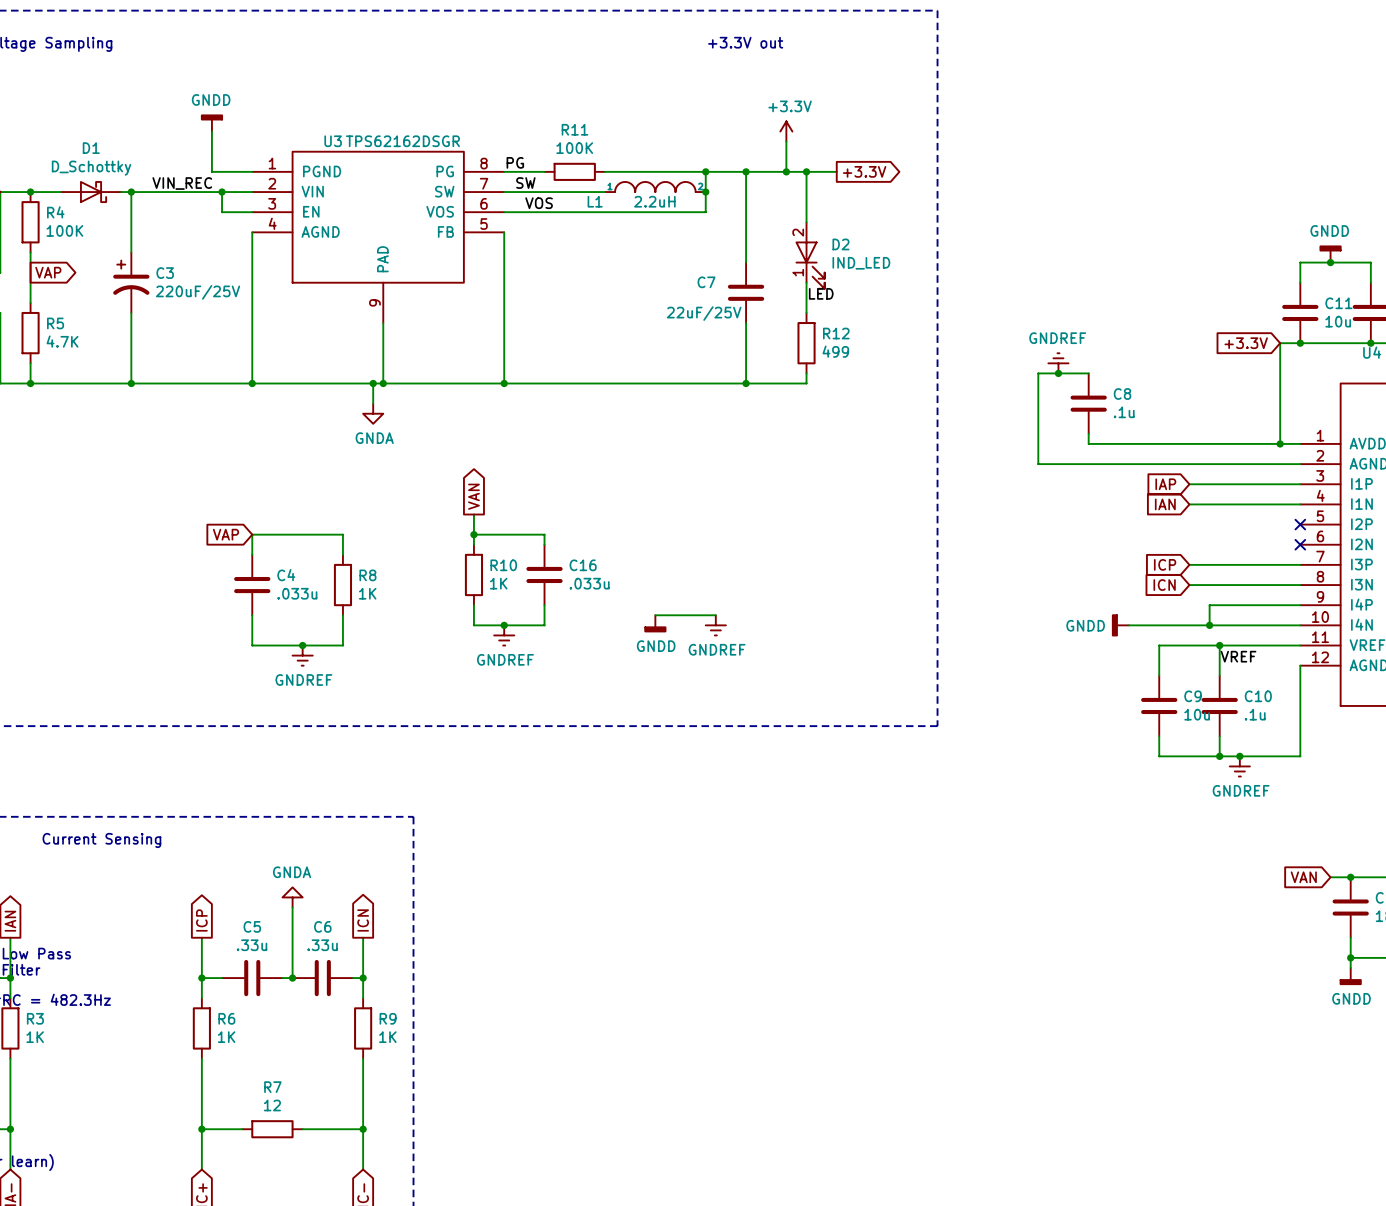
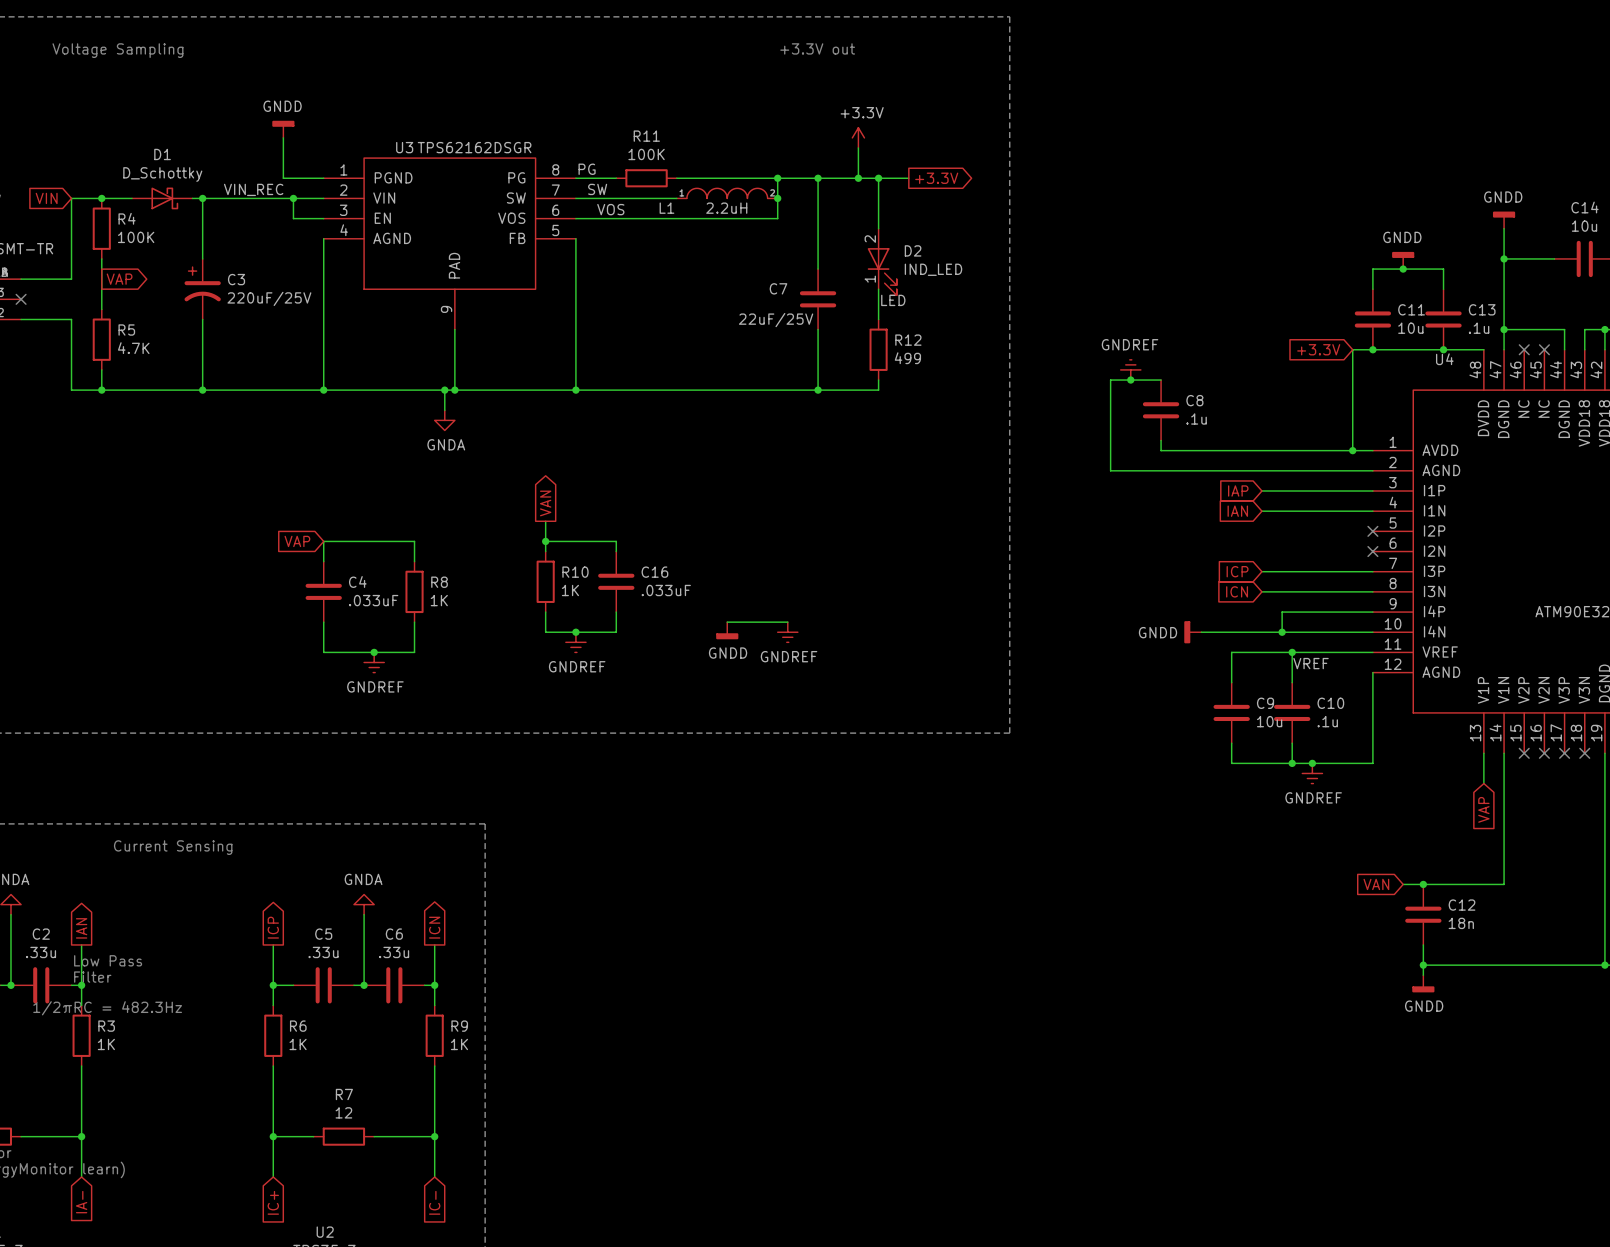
C16 value: .033u (589, 583) -> .033uF (666, 590)
C4 value: .033u (297, 593) -> .033uF (373, 600)

